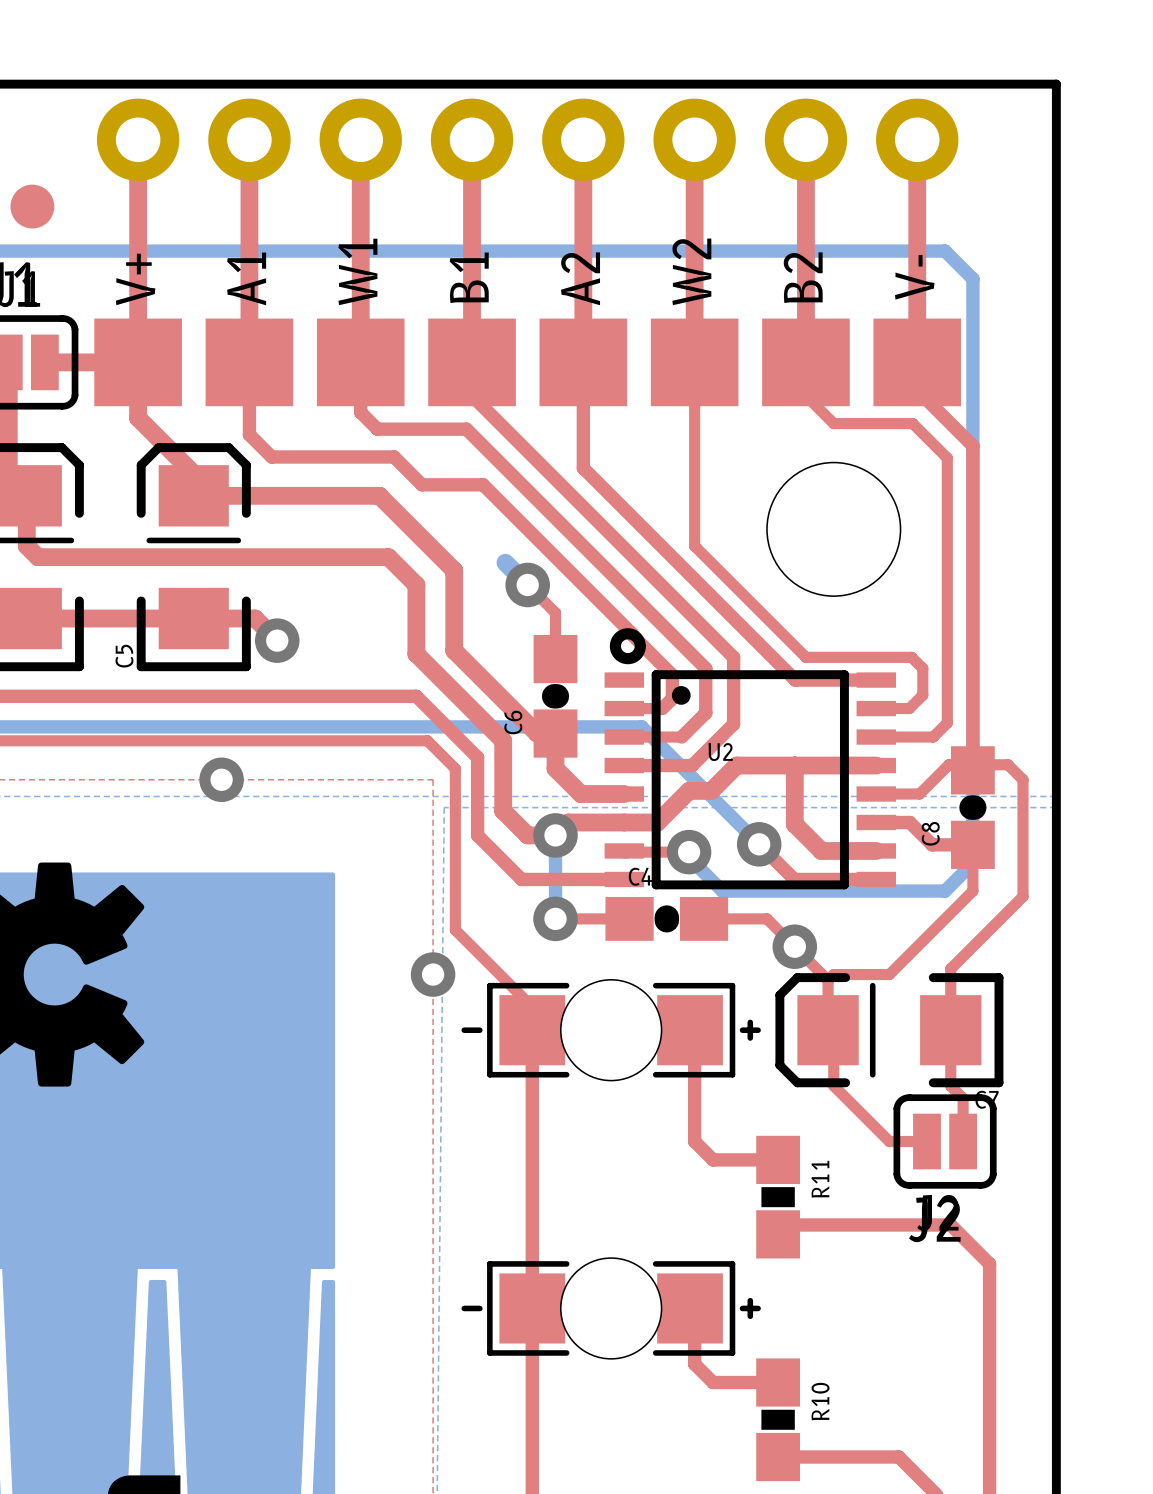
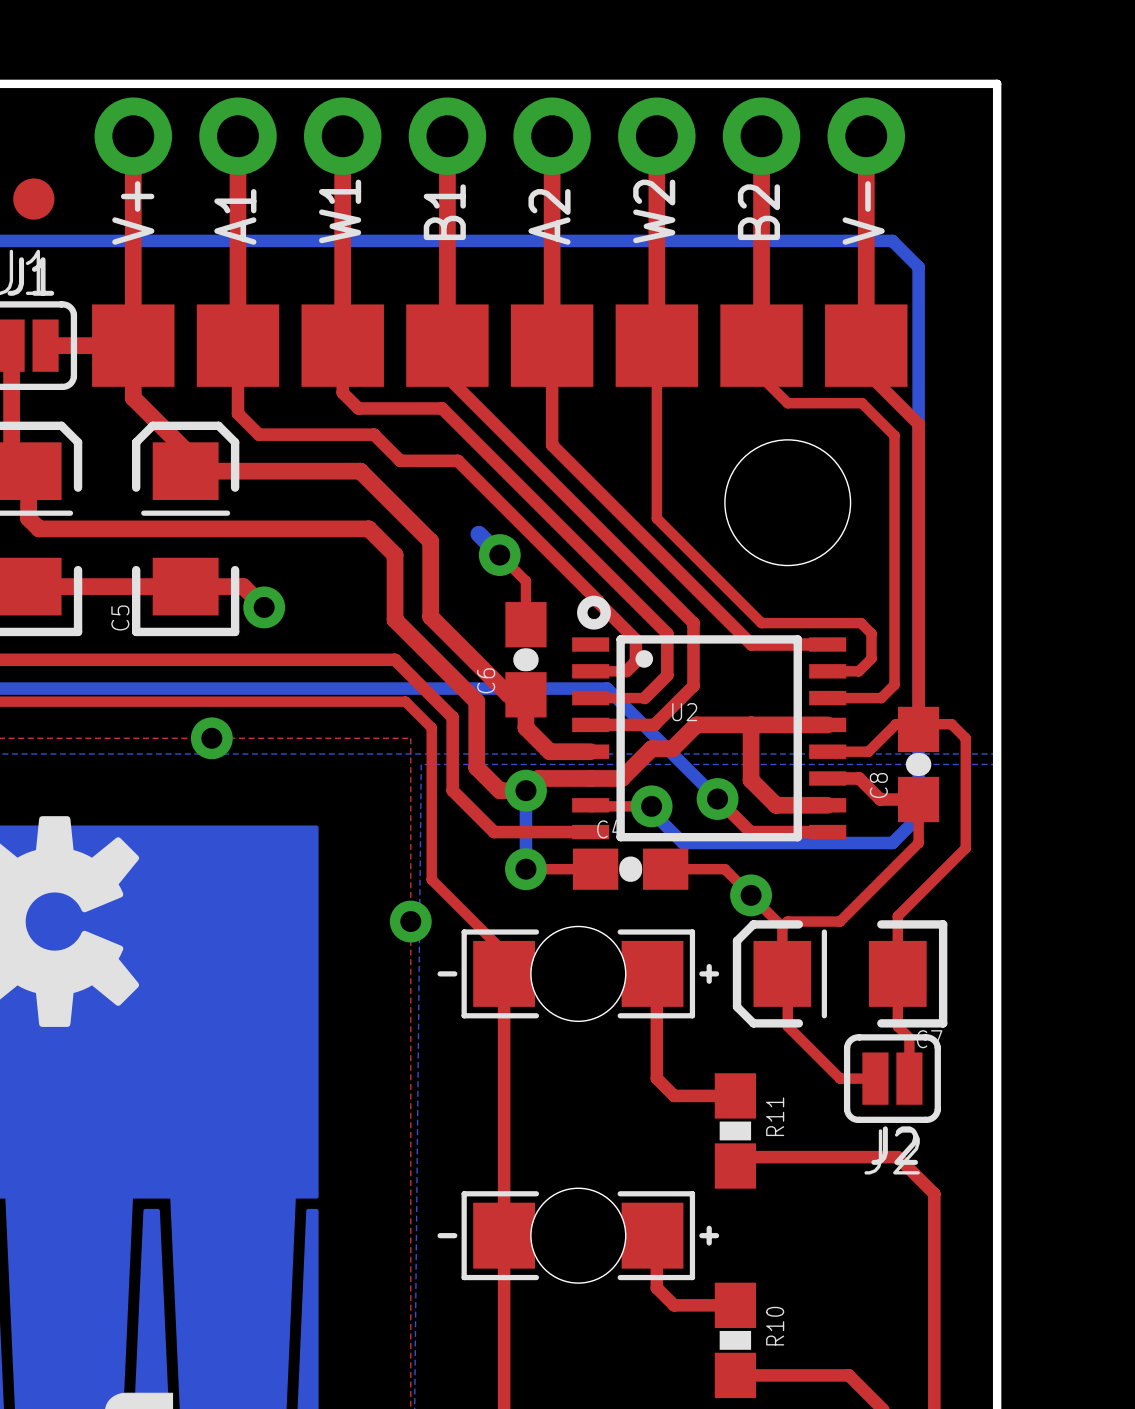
text position: W1 (357, 271) -> W1 (340, 211)
text position: W2 (691, 271) -> W2 (654, 211)
text position: B1 (469, 277) -> B1 (444, 212)
text position: B2 (803, 277) -> B2 (758, 212)
text position: V- (914, 277) -> V- (863, 212)
text position: A1 (246, 278) -> A1 (235, 216)
text position: A2 (580, 278) -> A2 (549, 216)
text position: V+ (135, 279) -> V+ (133, 212)

